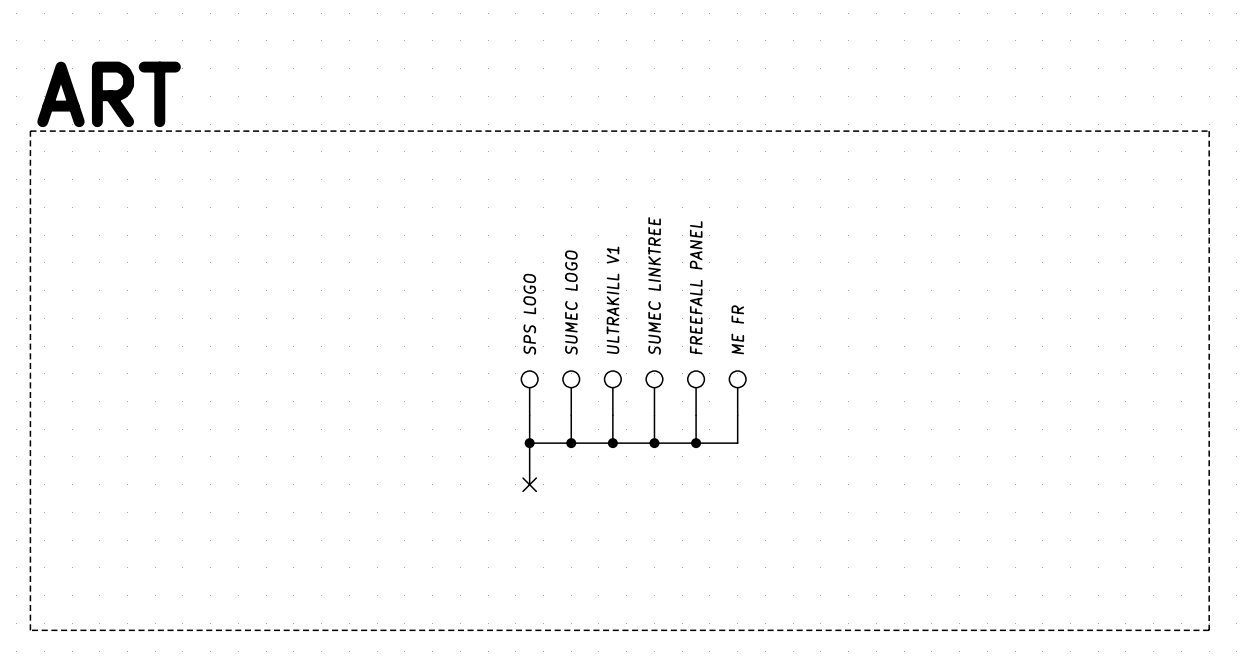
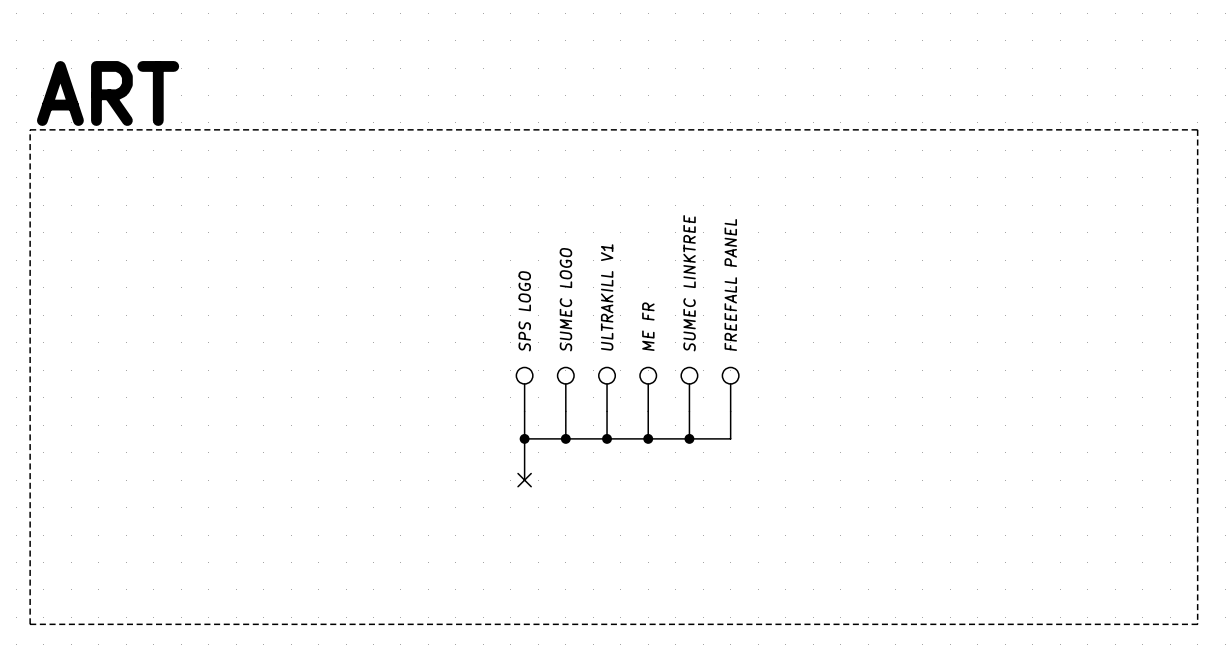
text: SUMEC LINKTREE (654, 285) -> ME FR (648, 326)
text: FREEFALL PANEL (696, 287) -> SUMEC LINKTREE (689, 283)
text: ME FR (737, 329) -> FREEFALL PANEL (730, 284)

